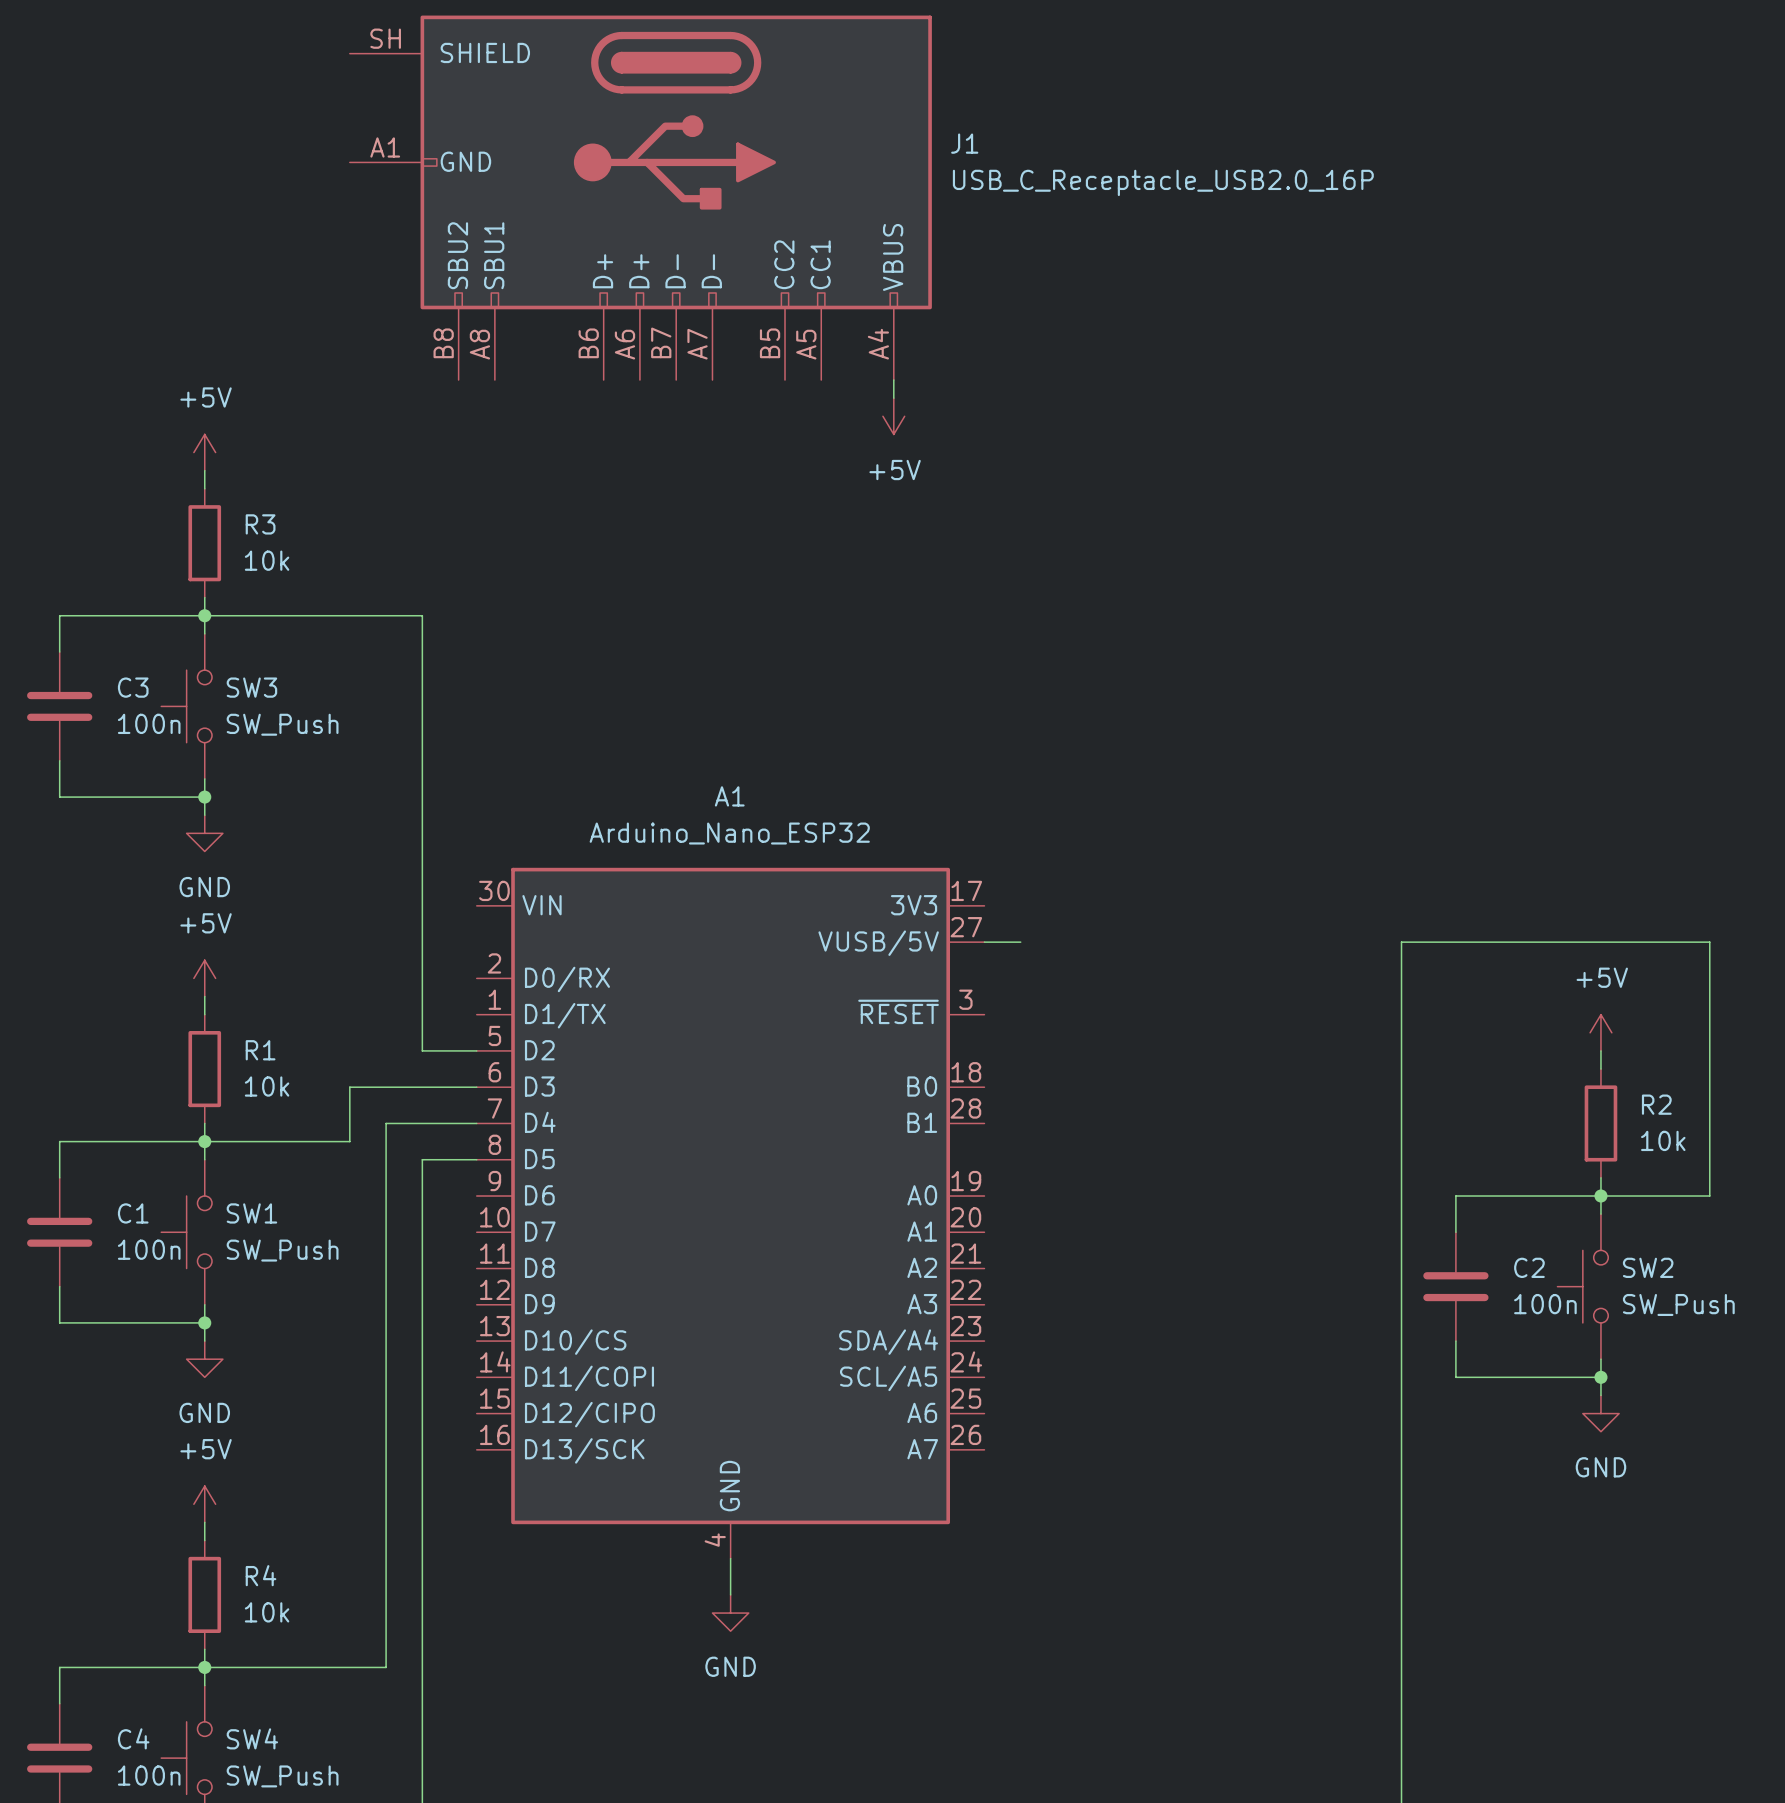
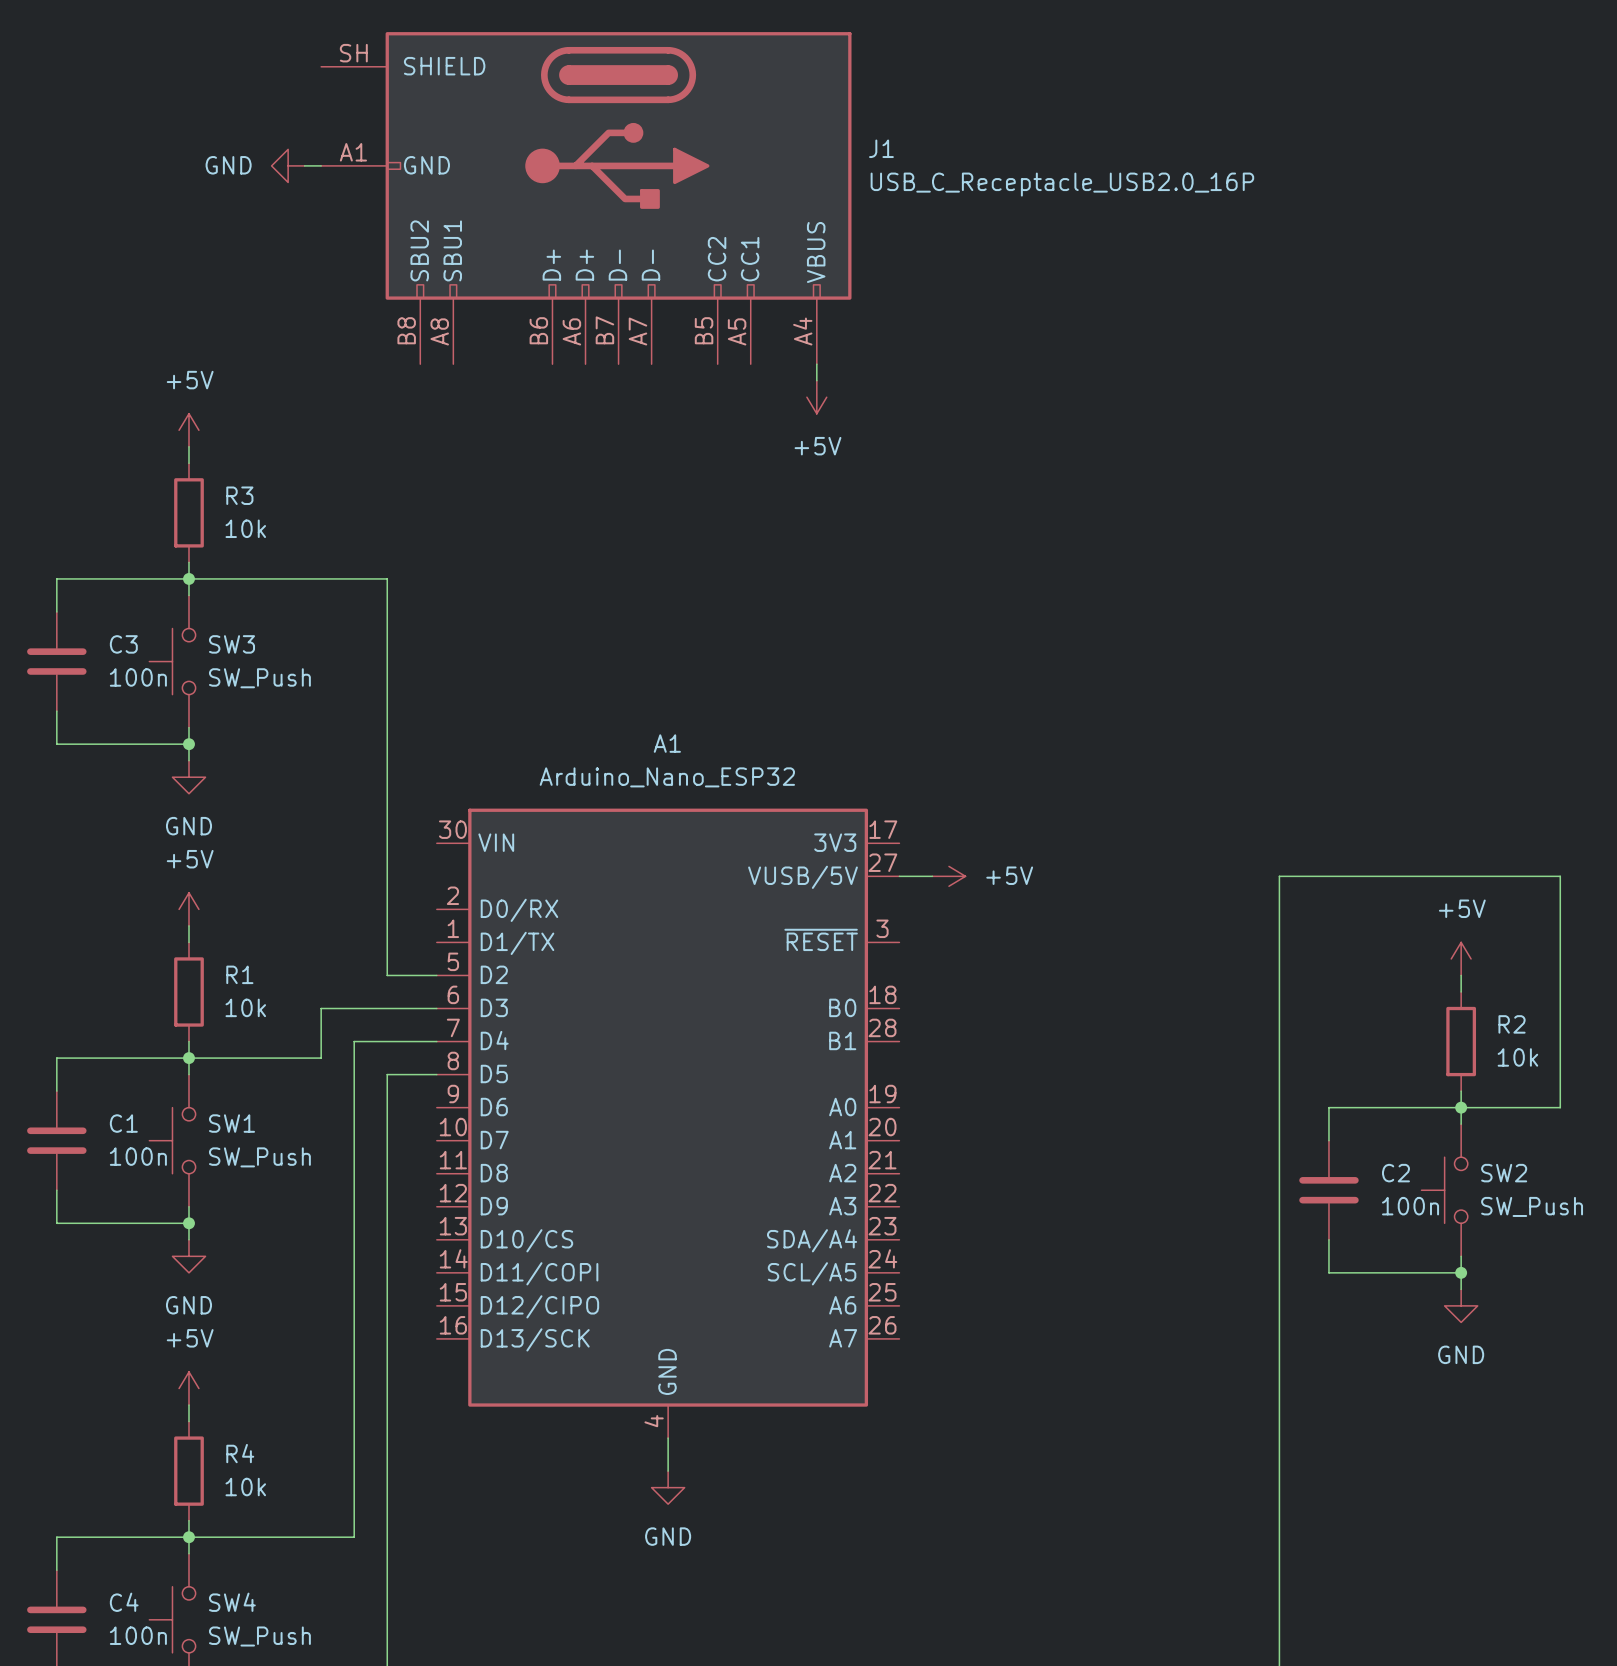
power symbol: none -> GND (288, 165)
wire: none -> (304, 165) (321, 165)
power symbol: none -> +5V (948, 876)

